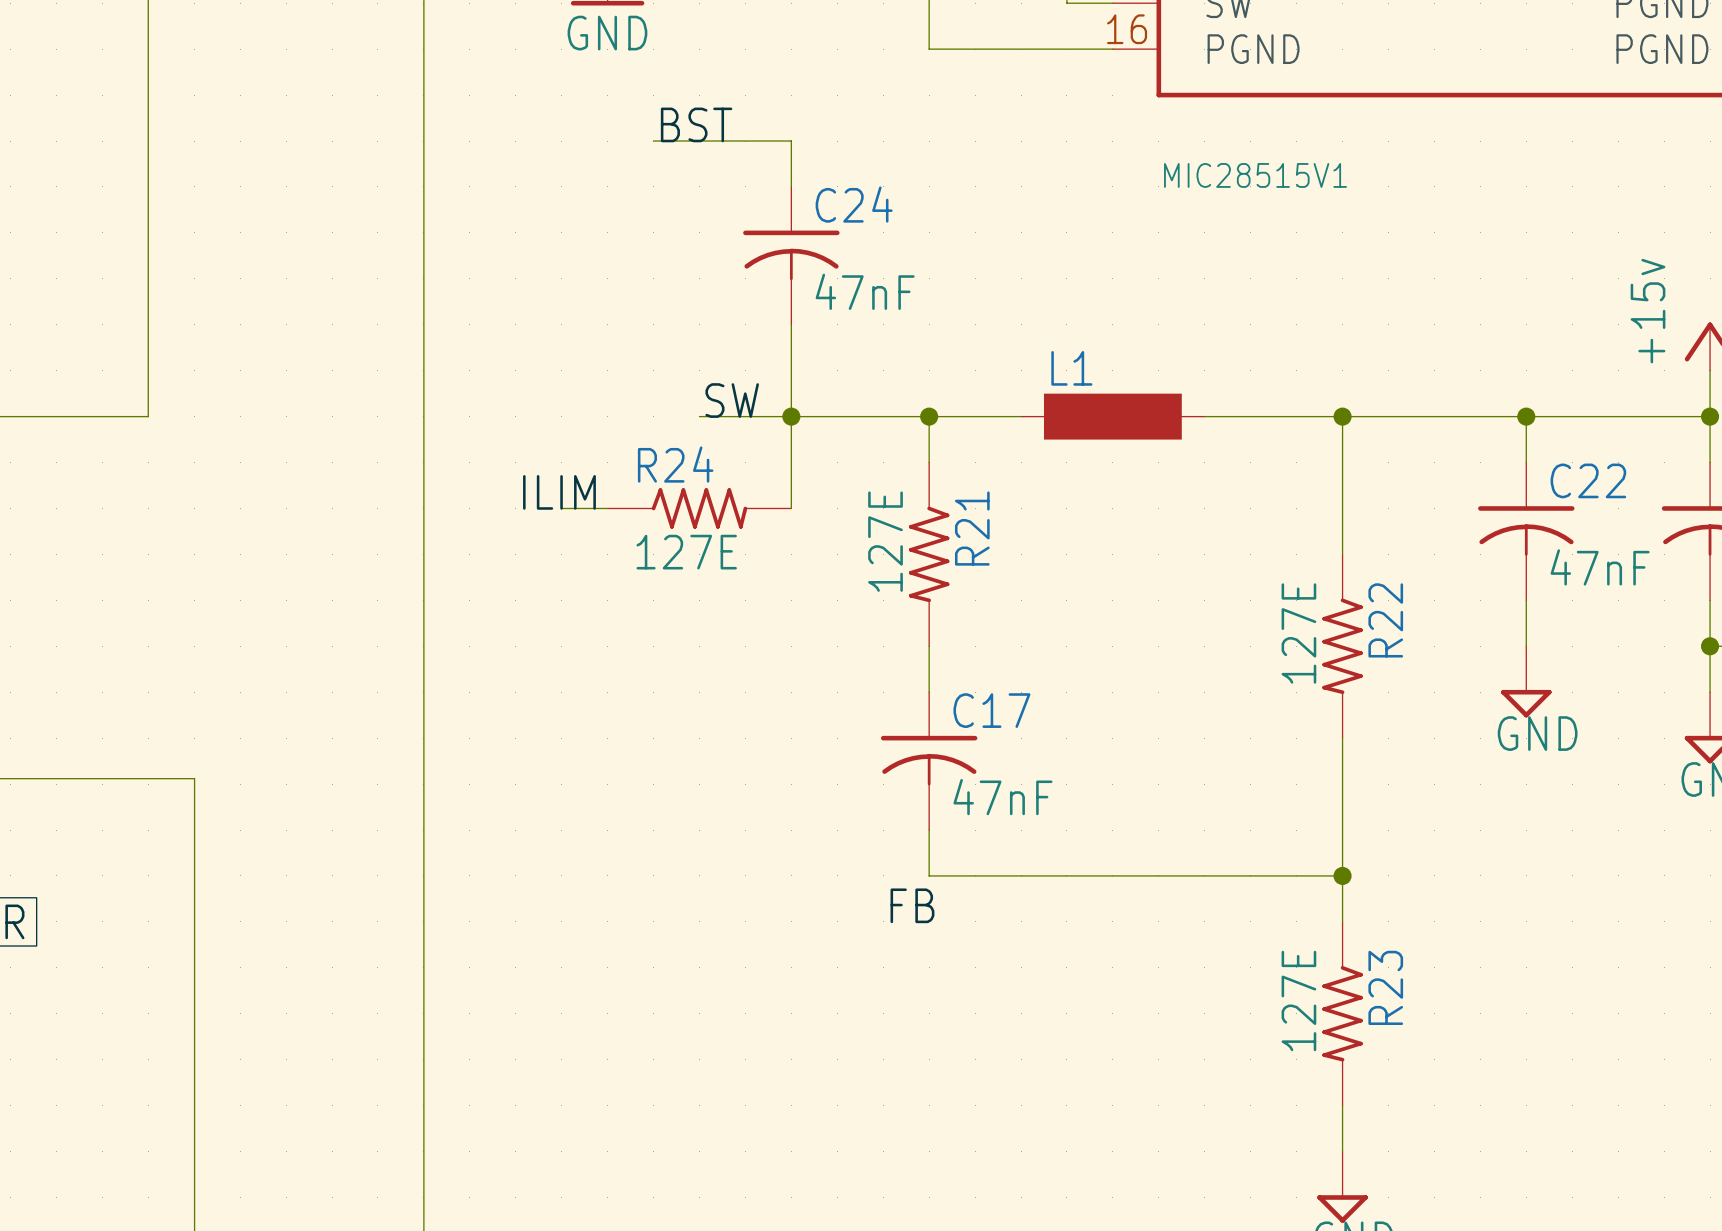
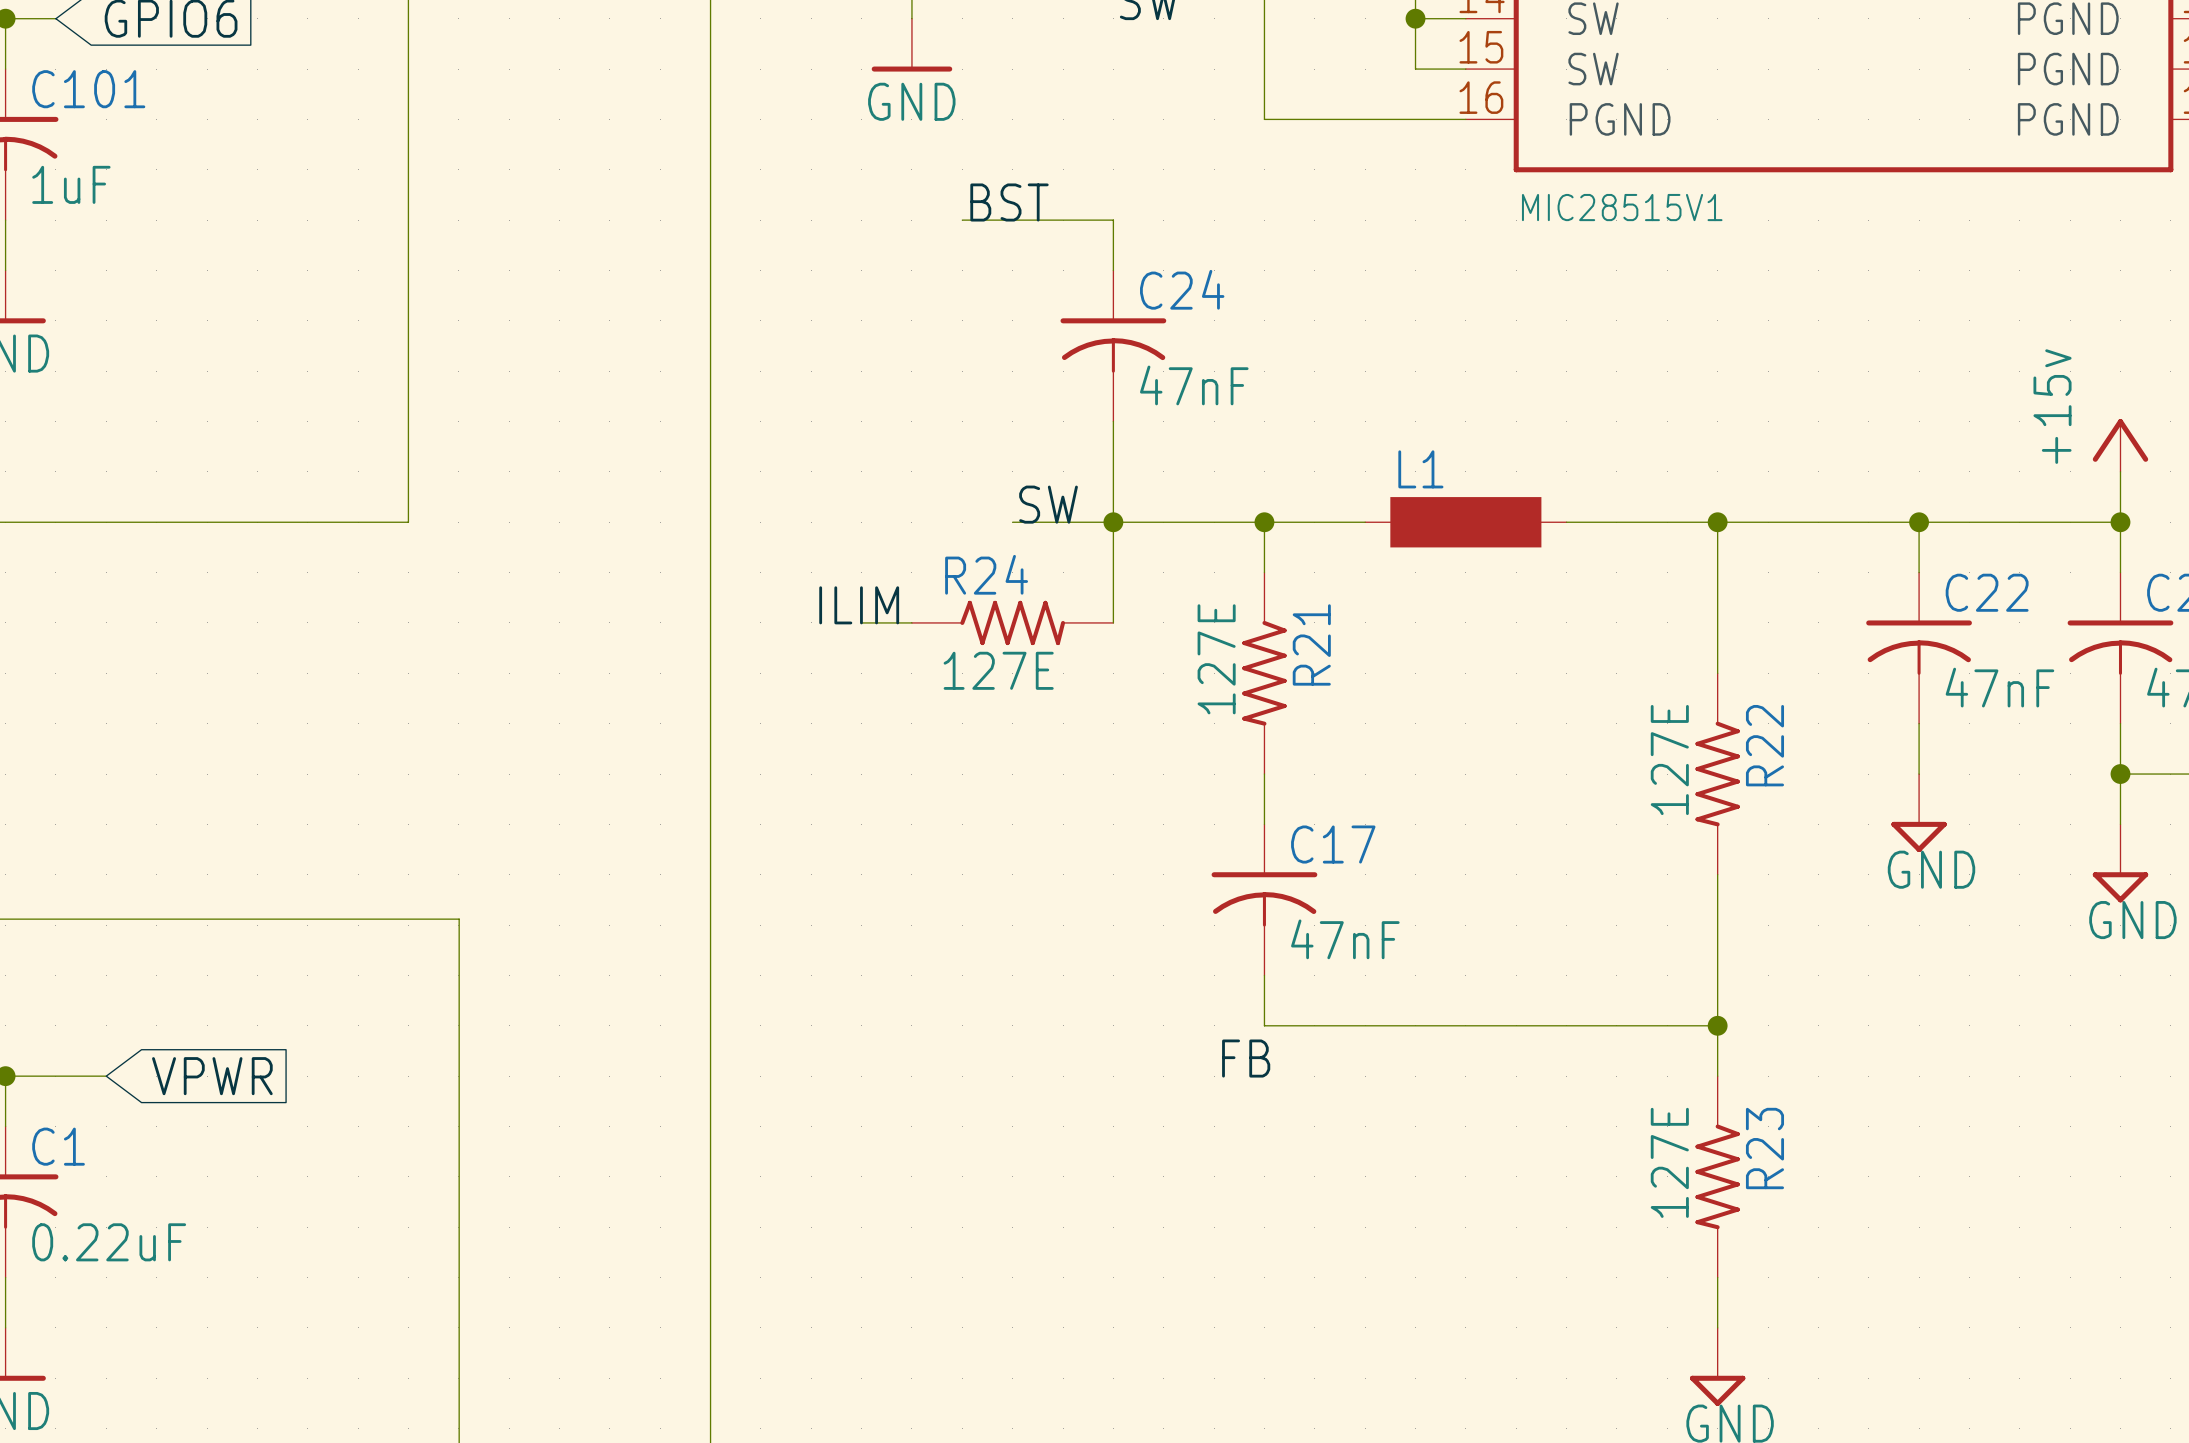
part value position: MIC28515V1 (1255, 175) -> MIC28515V1 (1622, 207)

